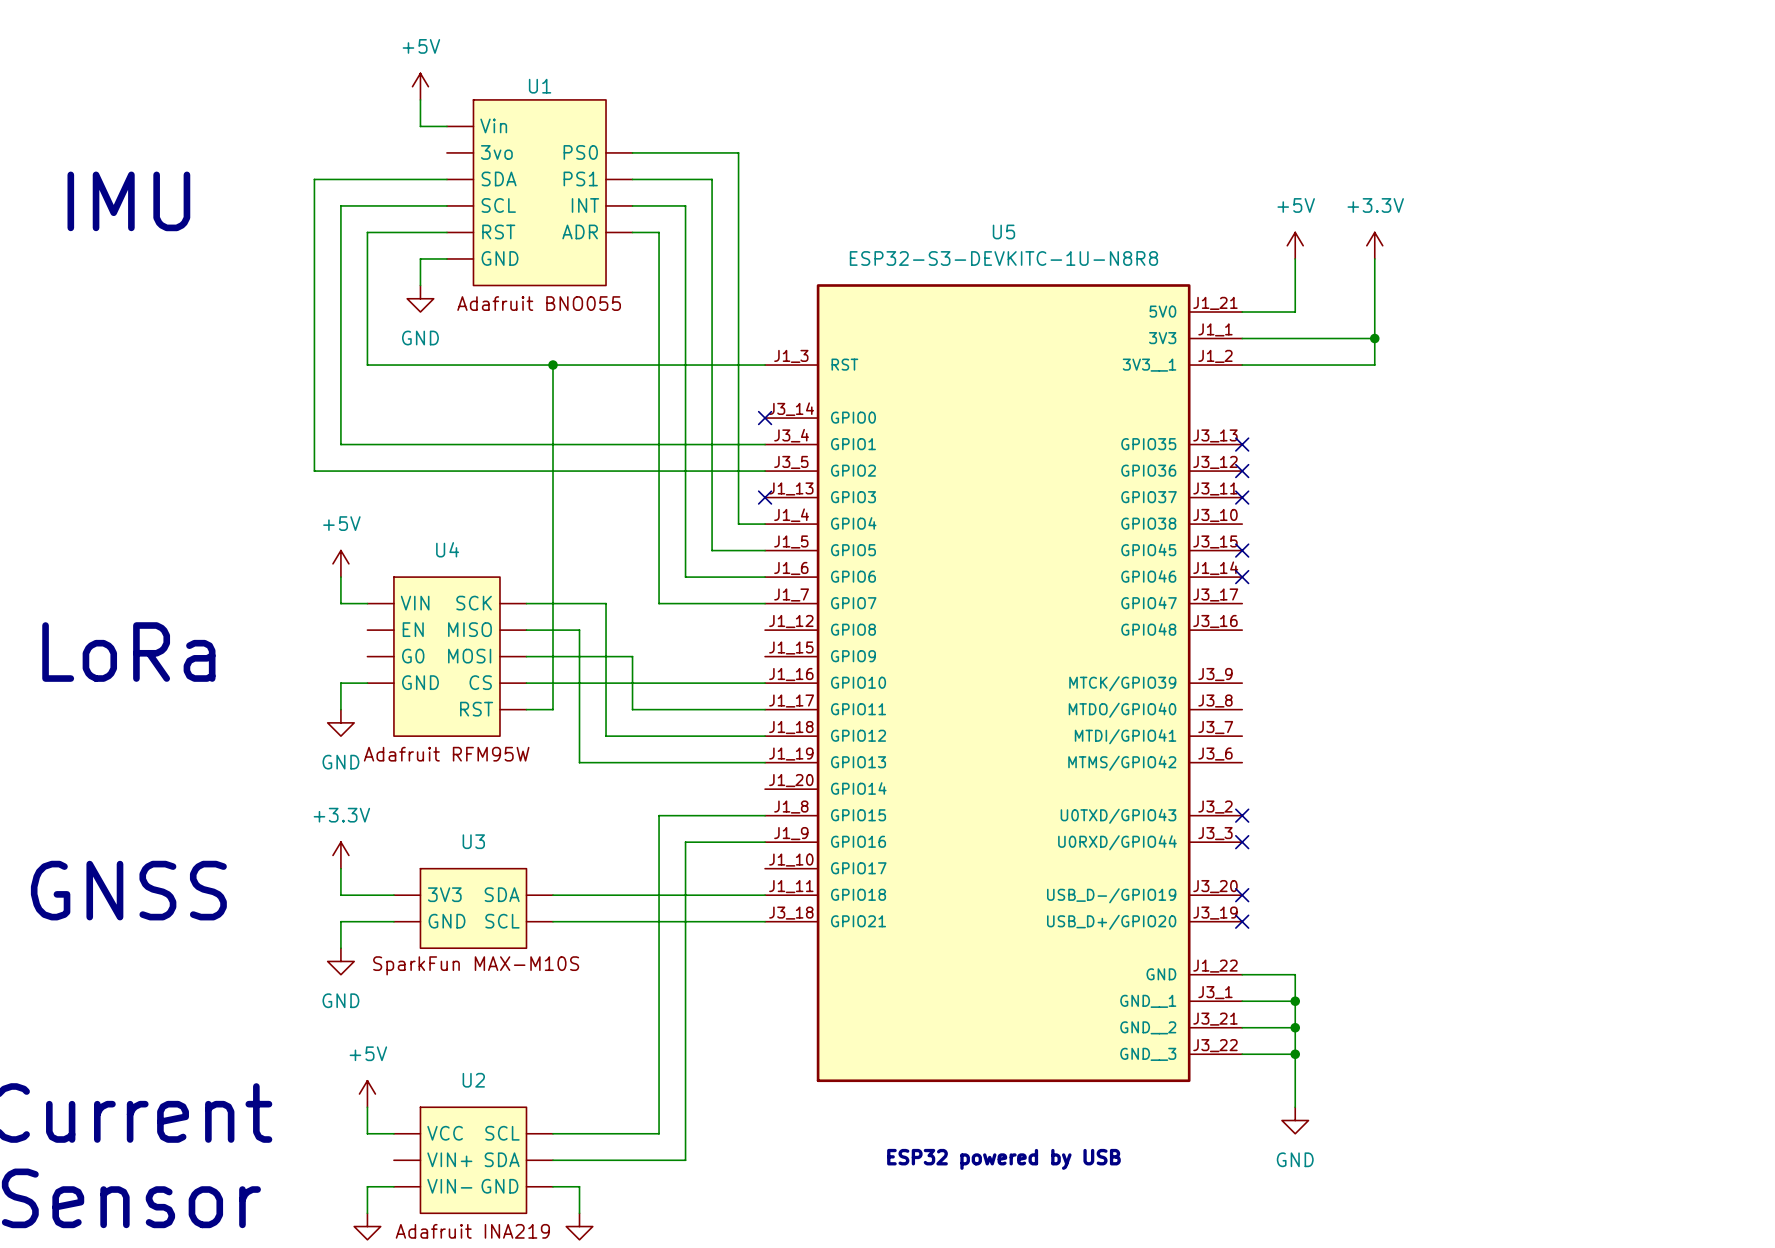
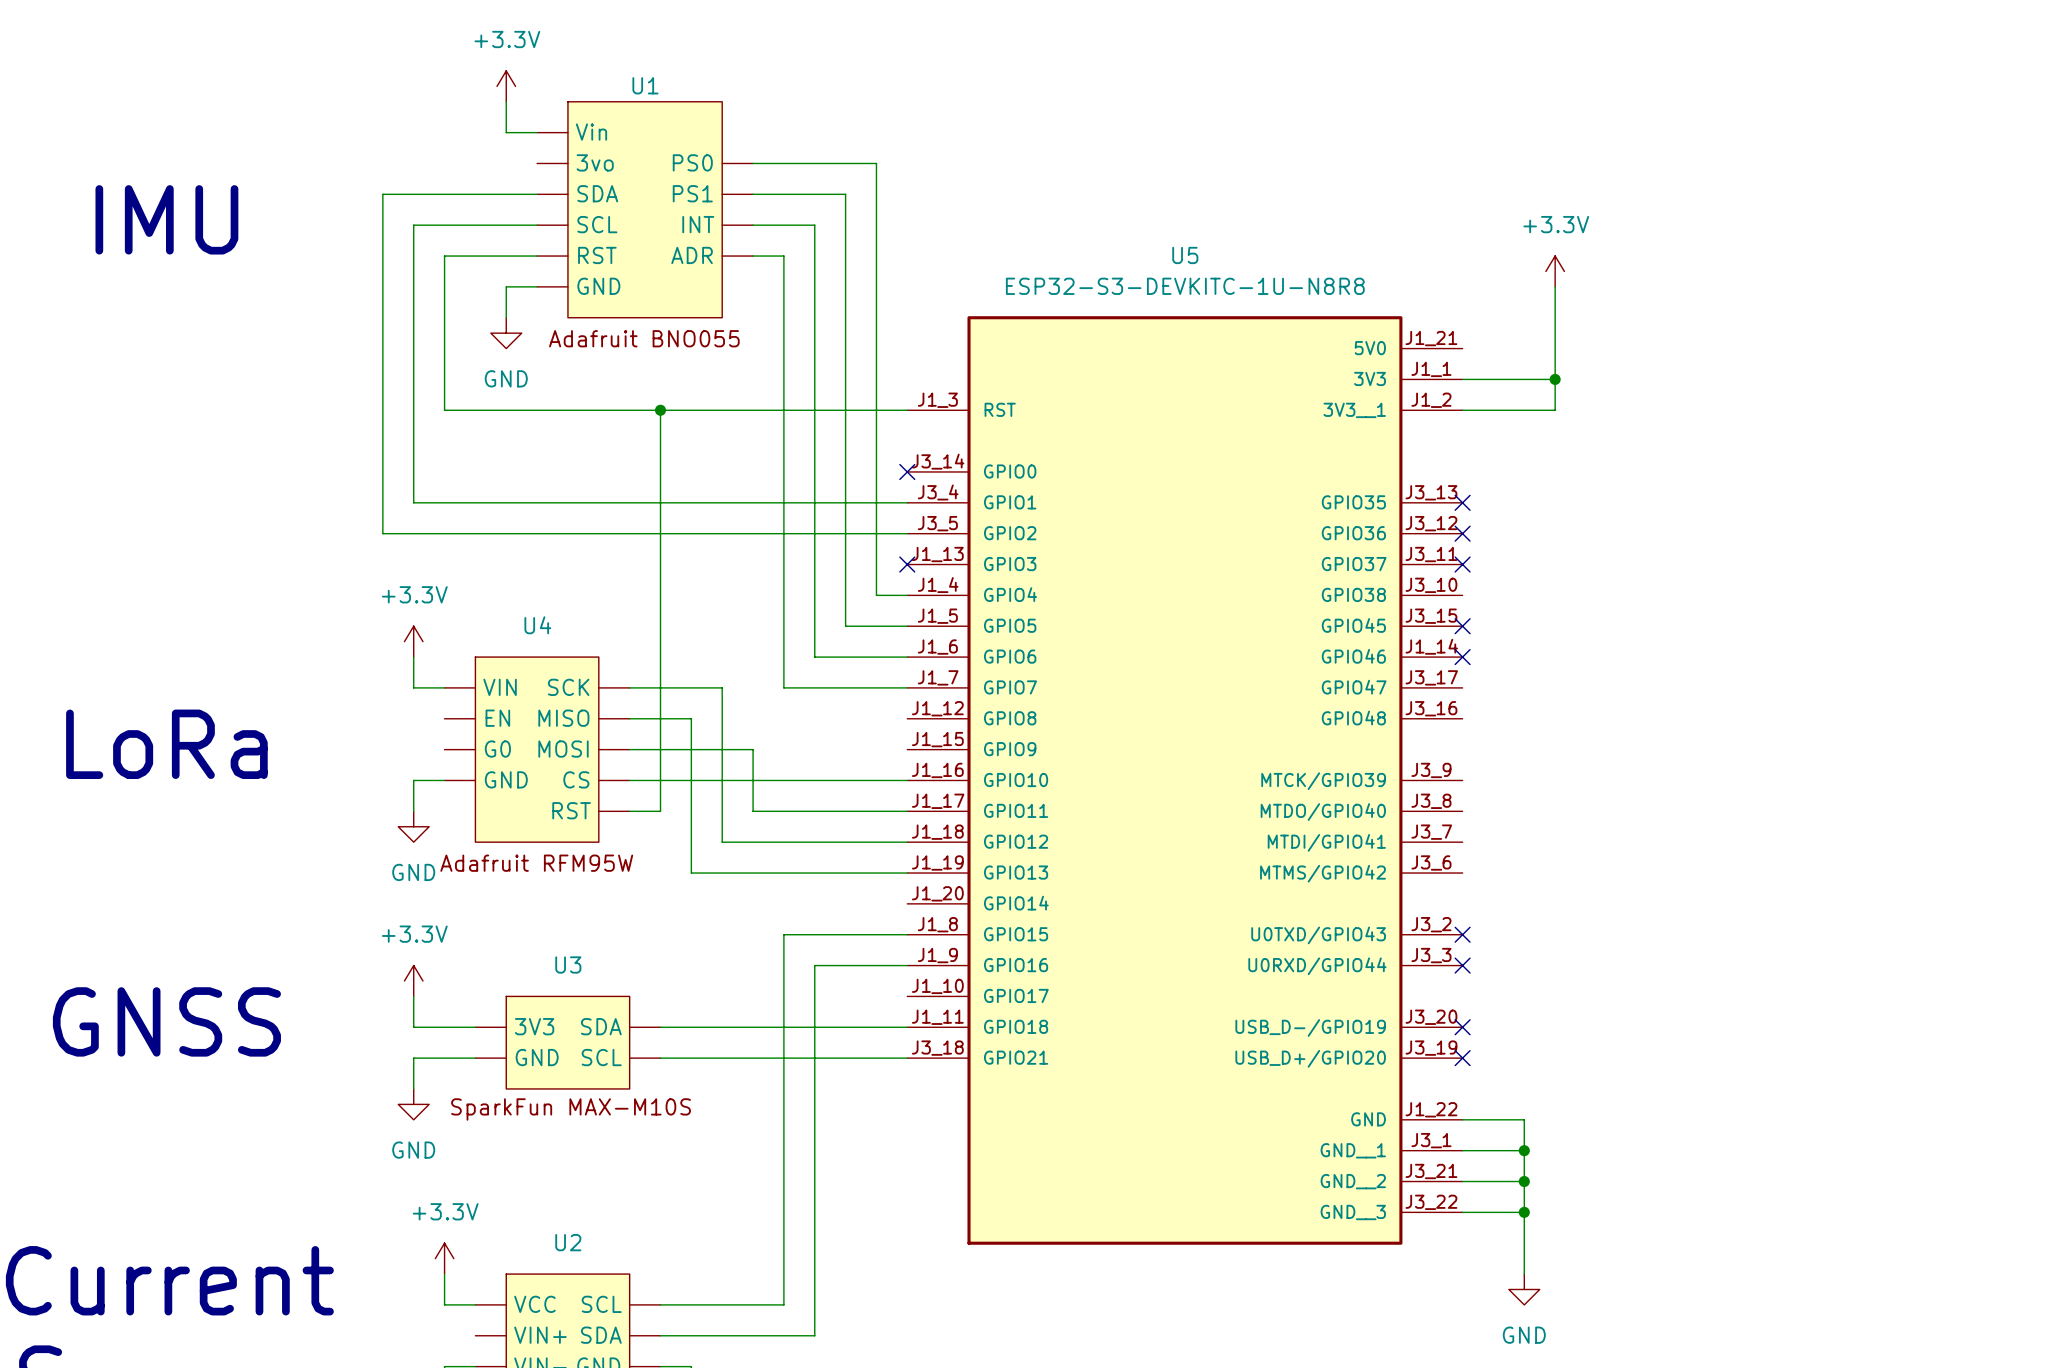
power symbol: +5V (420, 86) -> +3.3V (506, 86)
power symbol: +5V (1295, 245) -> none
power symbol position: +3.3V (1374, 245) -> +3.3V (1555, 271)
wire: (1295, 258) (1295, 312) (1242, 312) -> none
wire: (1374, 258) (1374, 365) (1321, 365) -> (1555, 286) (1555, 410)
wire: (1321, 338) (1374, 338) -> none
junction position: (1374, 338) -> (1555, 379)
power symbol: +5V (340, 563) -> +3.3V (413, 641)
power symbol: +5V (367, 1094) -> +3.3V (444, 1258)
text: ESP32 powered by USB (1003, 1159) -> none

